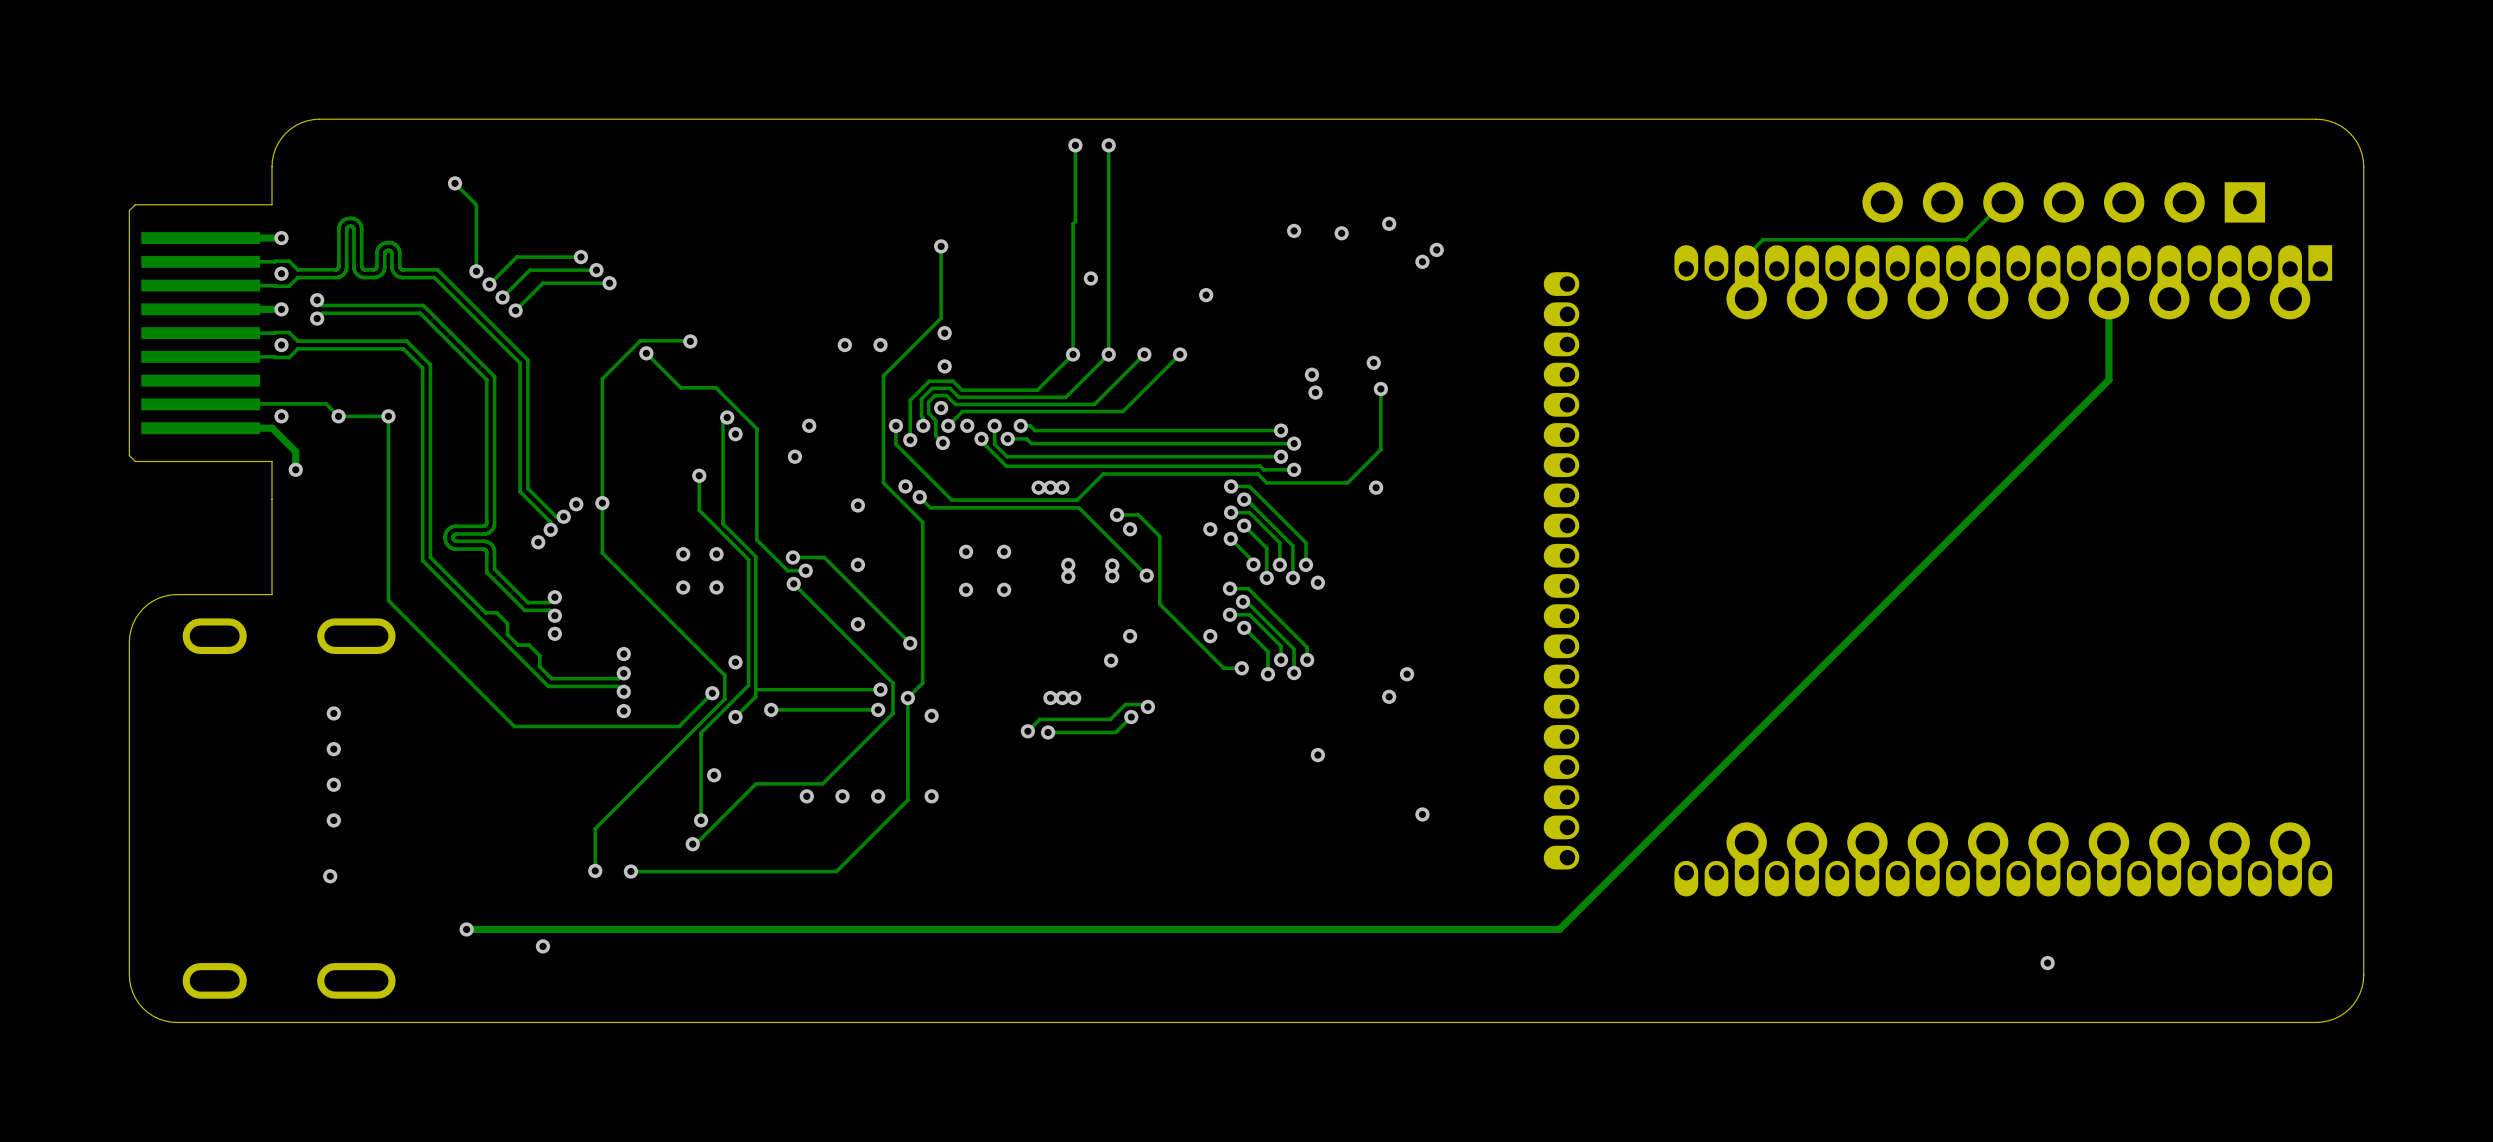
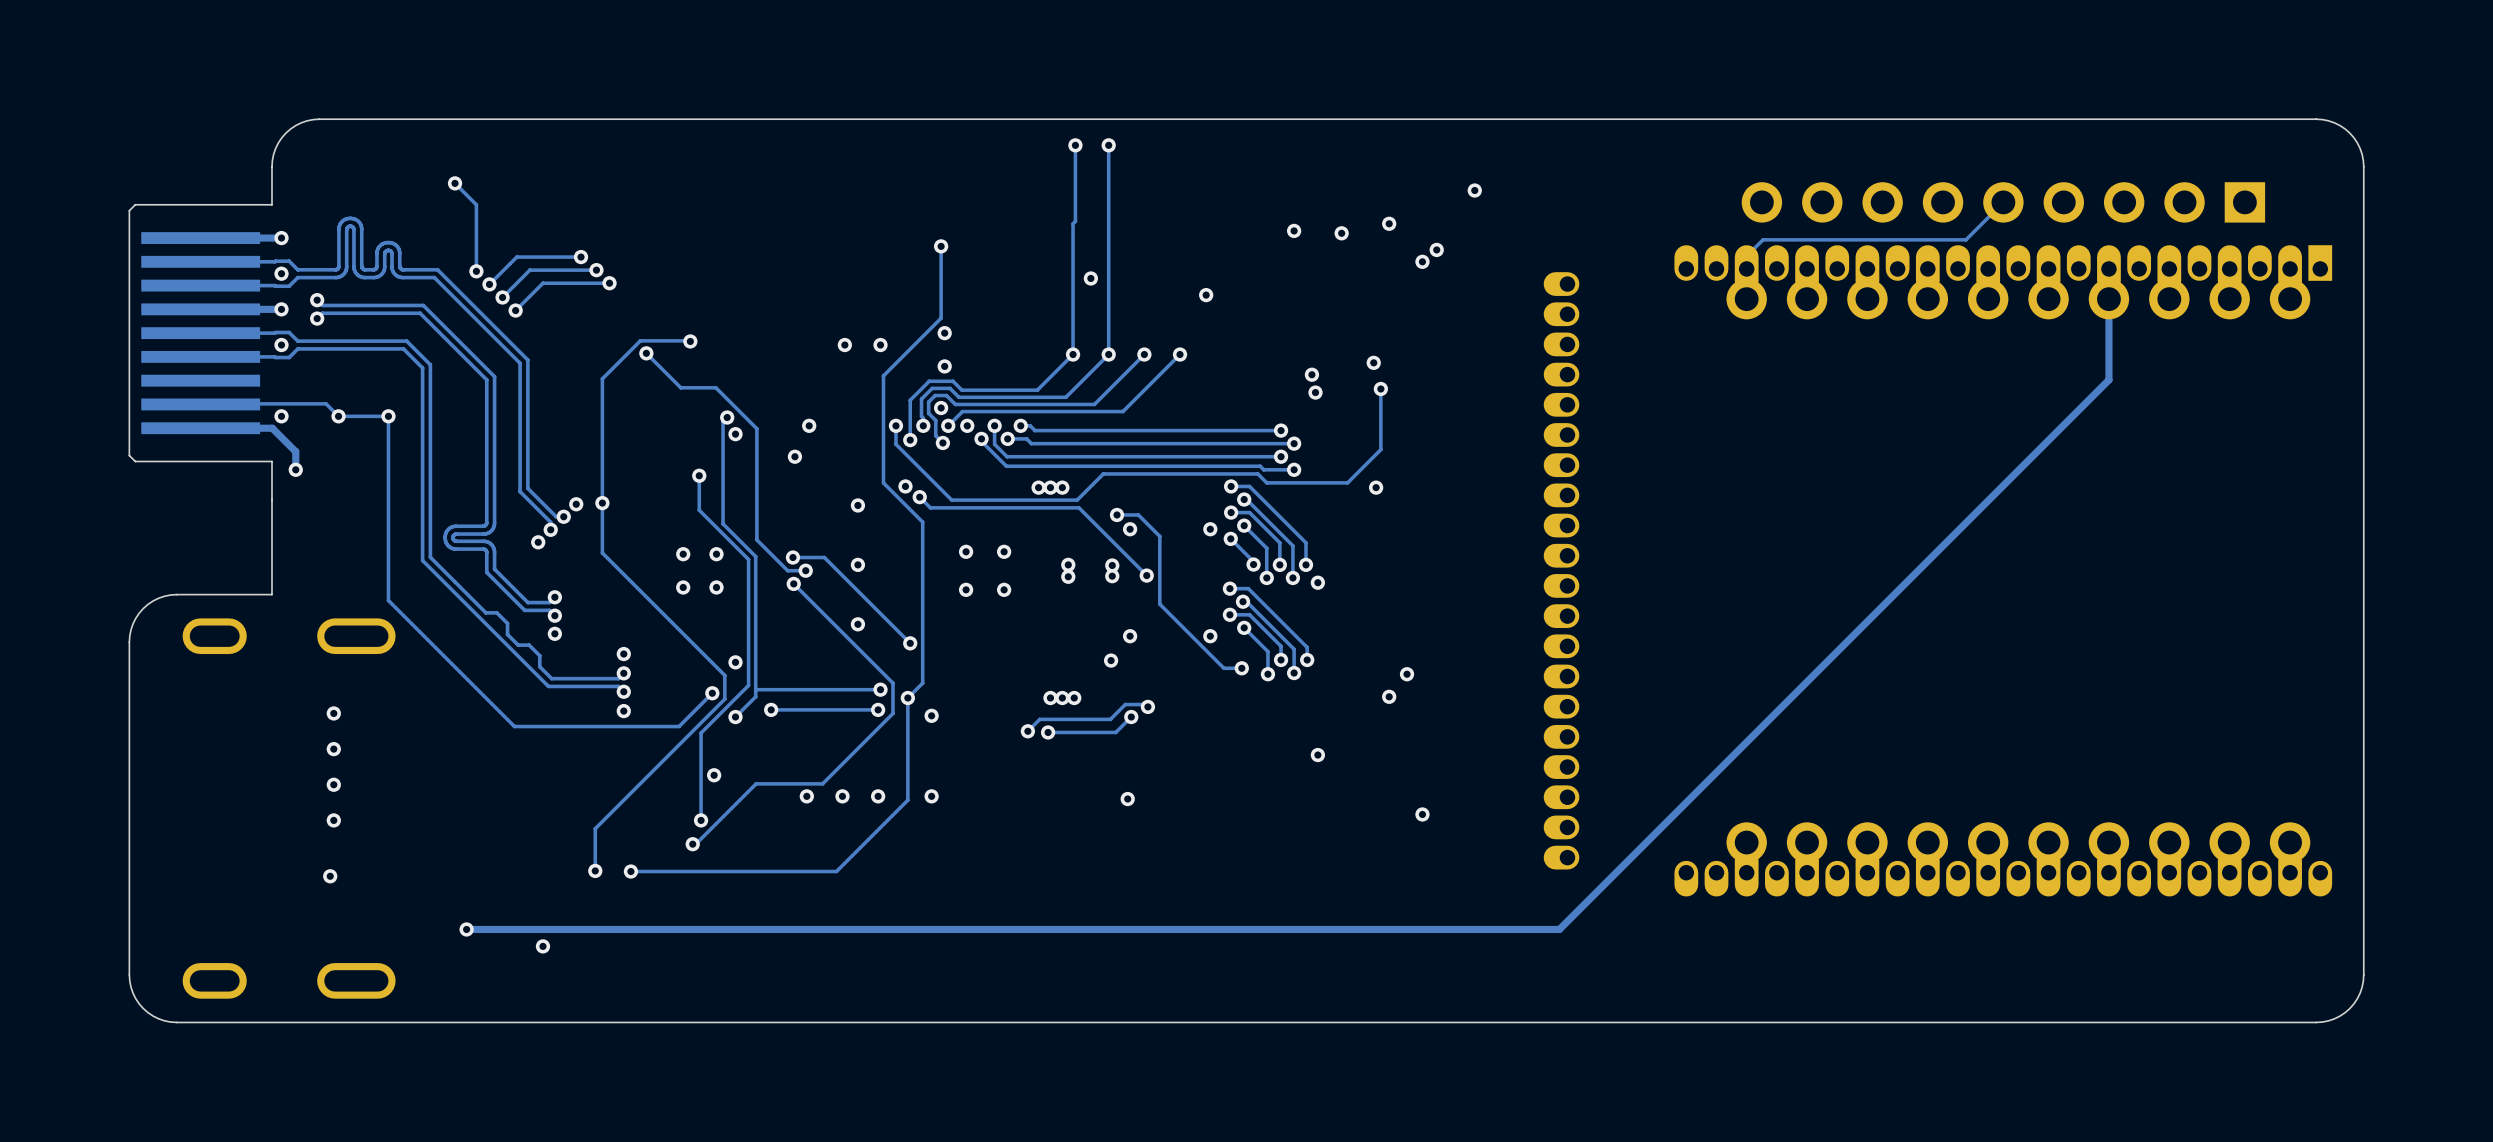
via: none -> (1474, 190)
part: none -> (2003, 202)
via: none -> (1127, 799)
via: (2047, 963) -> none

